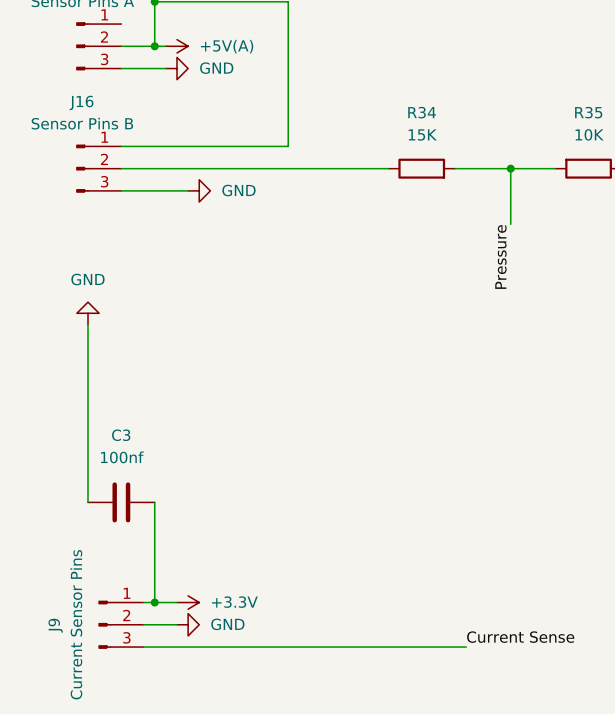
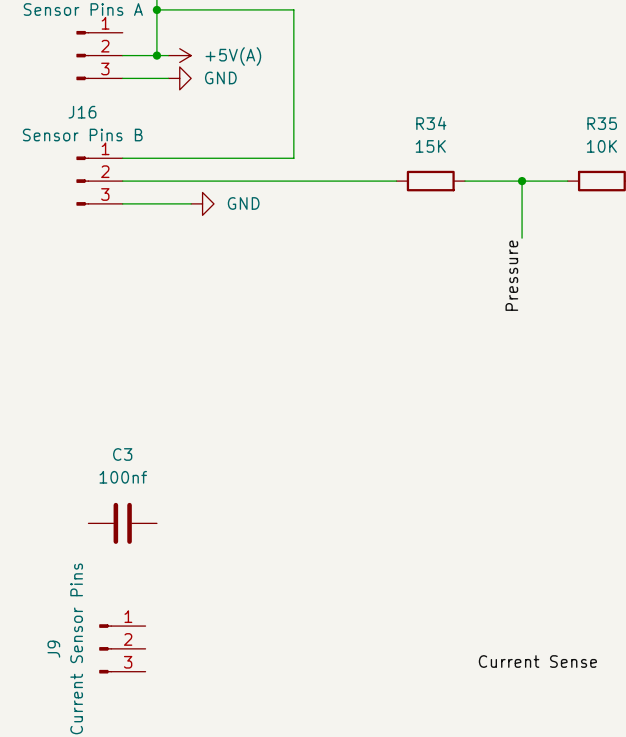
power symbol: GND (88, 313) -> none
wire: (88, 324) (88, 502) -> none
wire: (154, 502) (154, 602) -> none
wire: (143, 602) (176, 602) -> none
junction: (154, 602) -> none
power symbol: +3.3V (188, 602) -> none
wire: (143, 624) (176, 624) -> none
power symbol: GND (188, 624) -> none
wire: (143, 647) (466, 647) -> none

